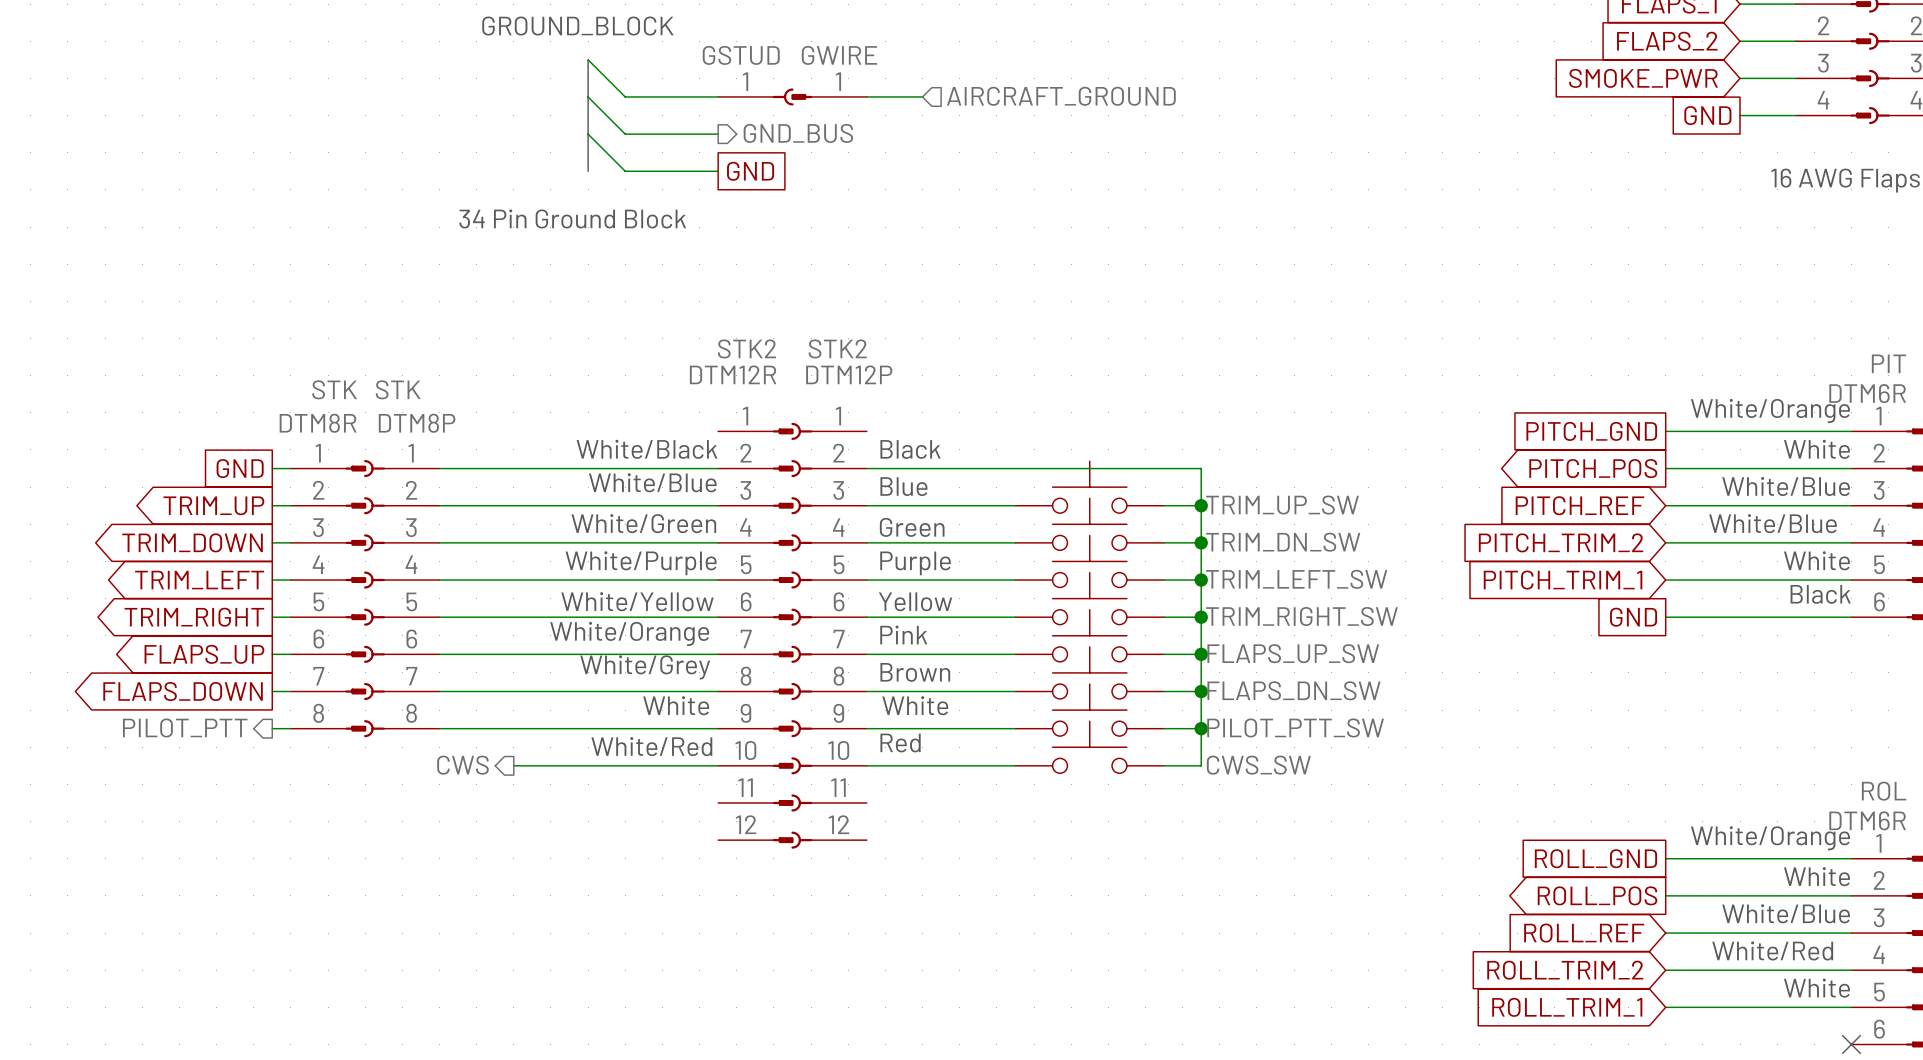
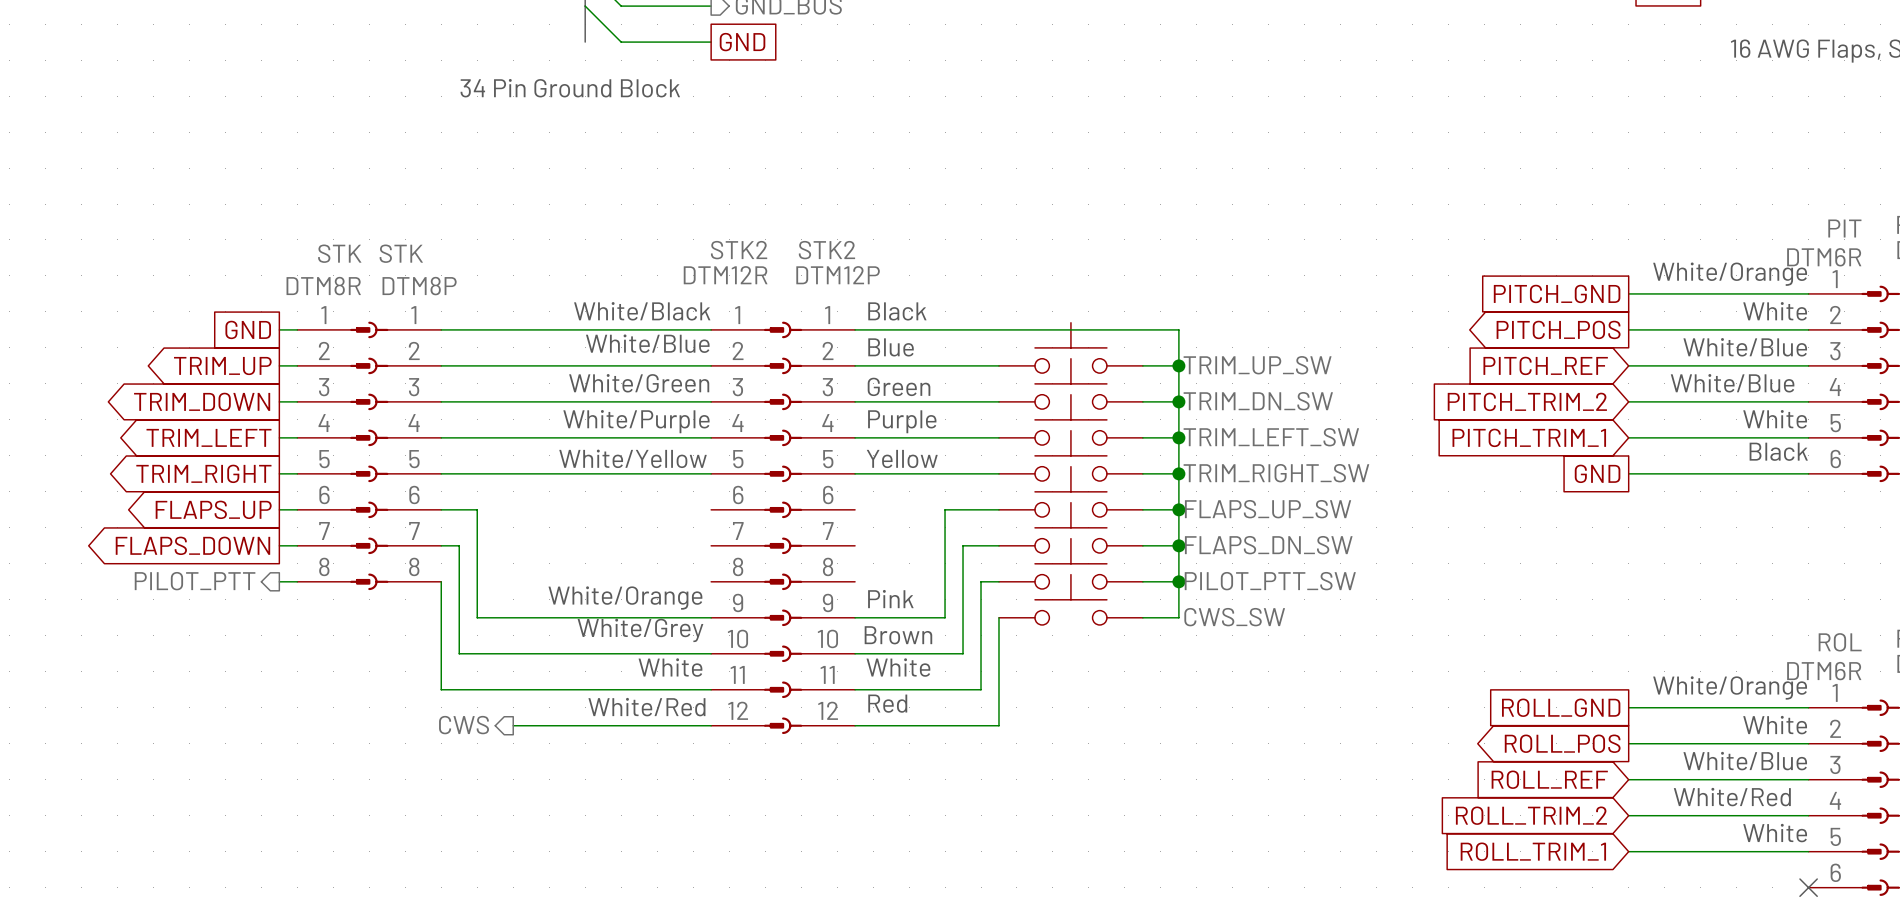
text position: White/Orange (629, 633) -> White/Orange (625, 598)
STK2 position: (755, 635) -> (747, 527)
STK2 position: (829, 635) -> (818, 527)
text position: Pink (903, 635) -> Pink (890, 599)
wire: (476, 654) (718, 654) -> (477, 509) (477, 617) (513, 617)
wire: (866, 654) (959, 654) -> none
text position: White/Grey (645, 667) -> White/Grey (640, 630)
text position: Brown (915, 672) -> Brown (898, 635)
wire: (458, 691) (718, 691) -> (459, 545) (459, 653) (711, 653)
wire: (866, 691) (978, 691) -> (855, 653) (963, 653) (963, 545)
text: White (676, 705) -> none
text: White (915, 705) -> none
wire: (439, 728) (718, 728) -> (441, 581) (441, 689) (711, 689)
wire: (866, 728) (996, 728) -> (855, 689) (981, 689) (981, 581)
text position: Red (900, 743) -> Red (887, 703)
text position: White/Red (651, 746) -> White/Red (646, 707)
hierarchical label position: CWS (462, 765) -> CWS (464, 725)
wire: (959, 765) (1015, 765) -> (945, 617) (945, 509)
wire: none -> (998, 617) (998, 725) (855, 725)
text: none -> White (670, 667)
text: none -> White (898, 667)
wire: none -> (513, 725) (711, 725)

